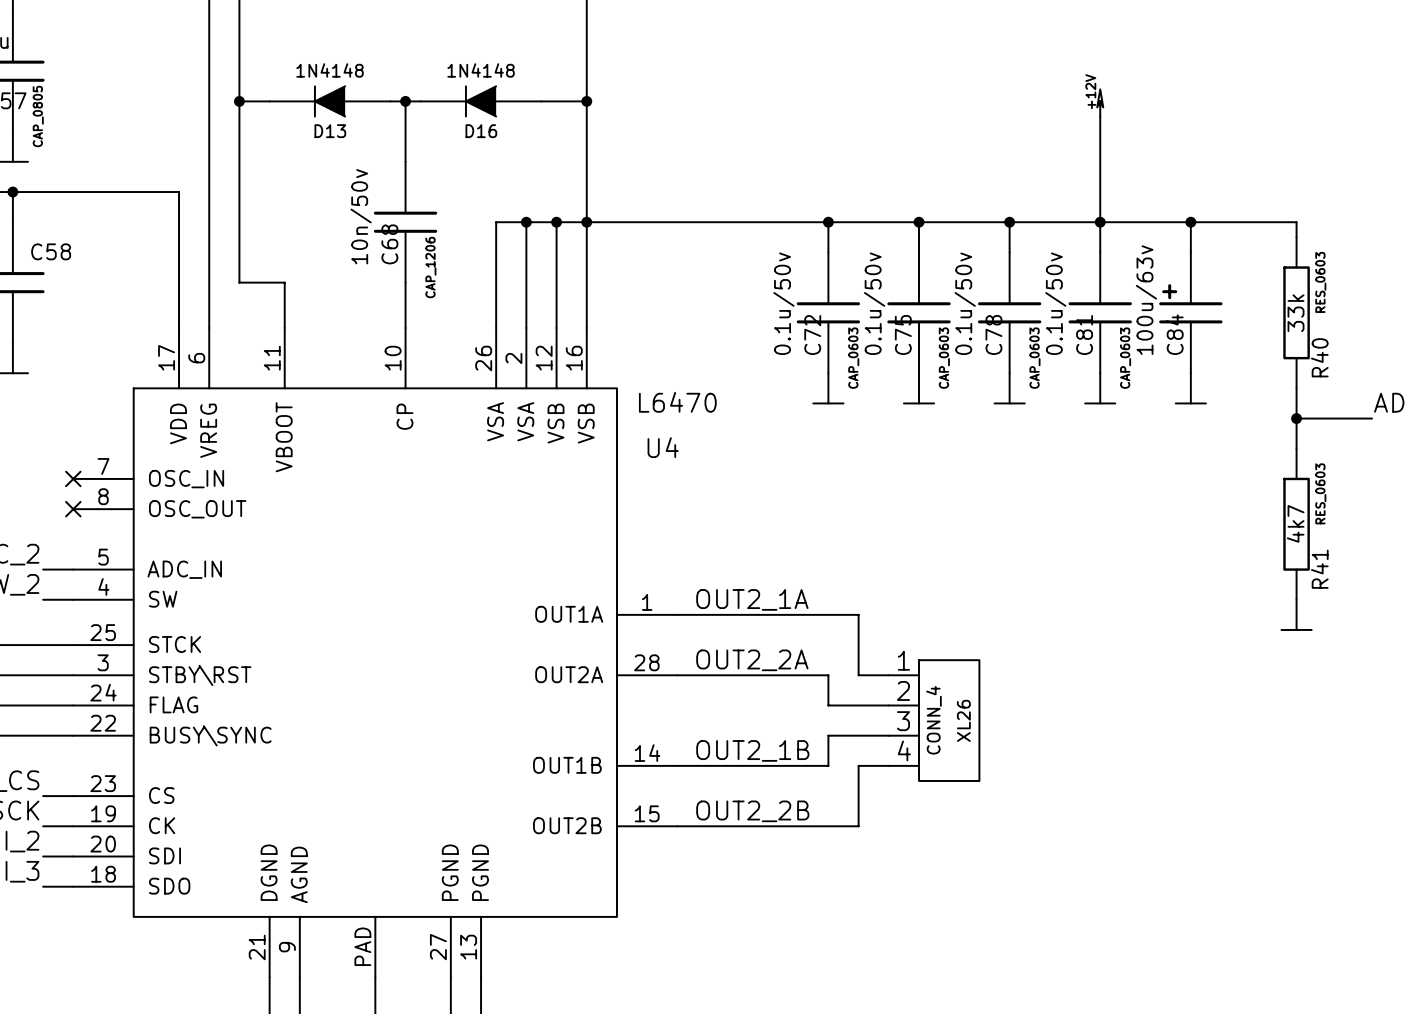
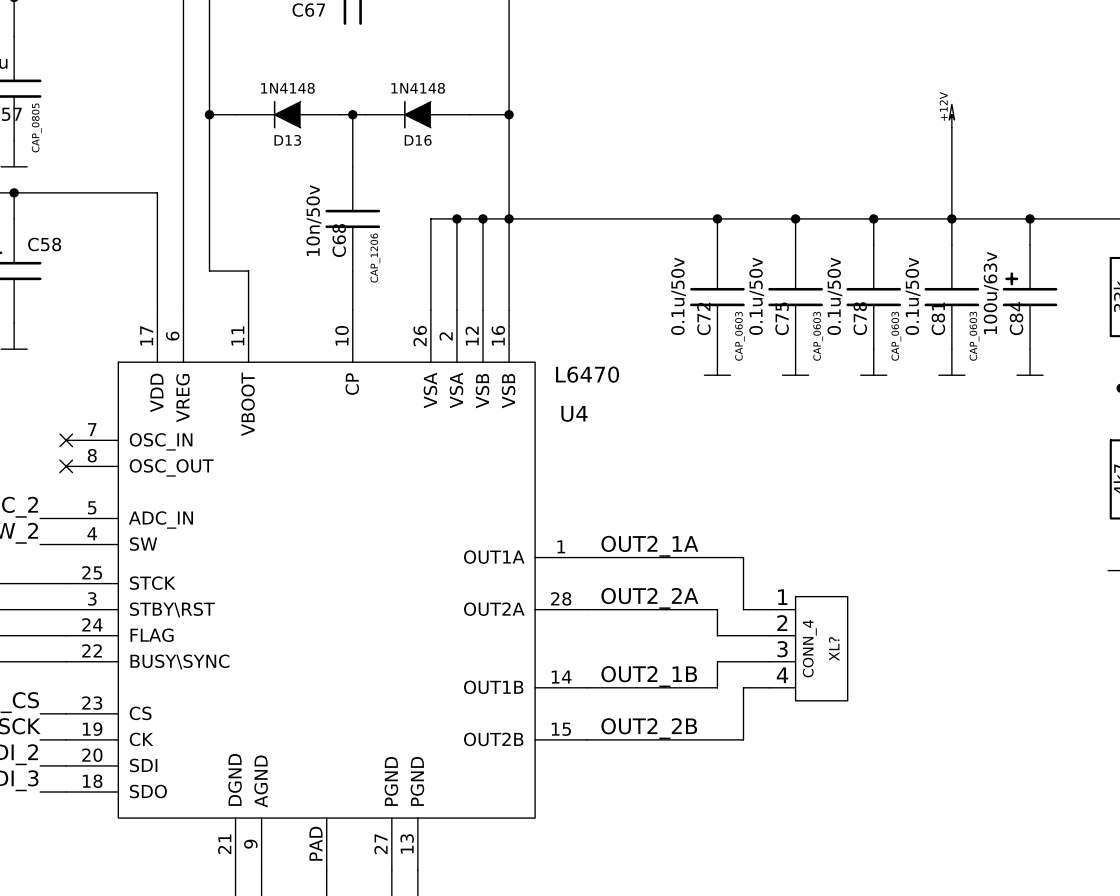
XL26 name: XL26 (963, 720) -> XL? (834, 649)

